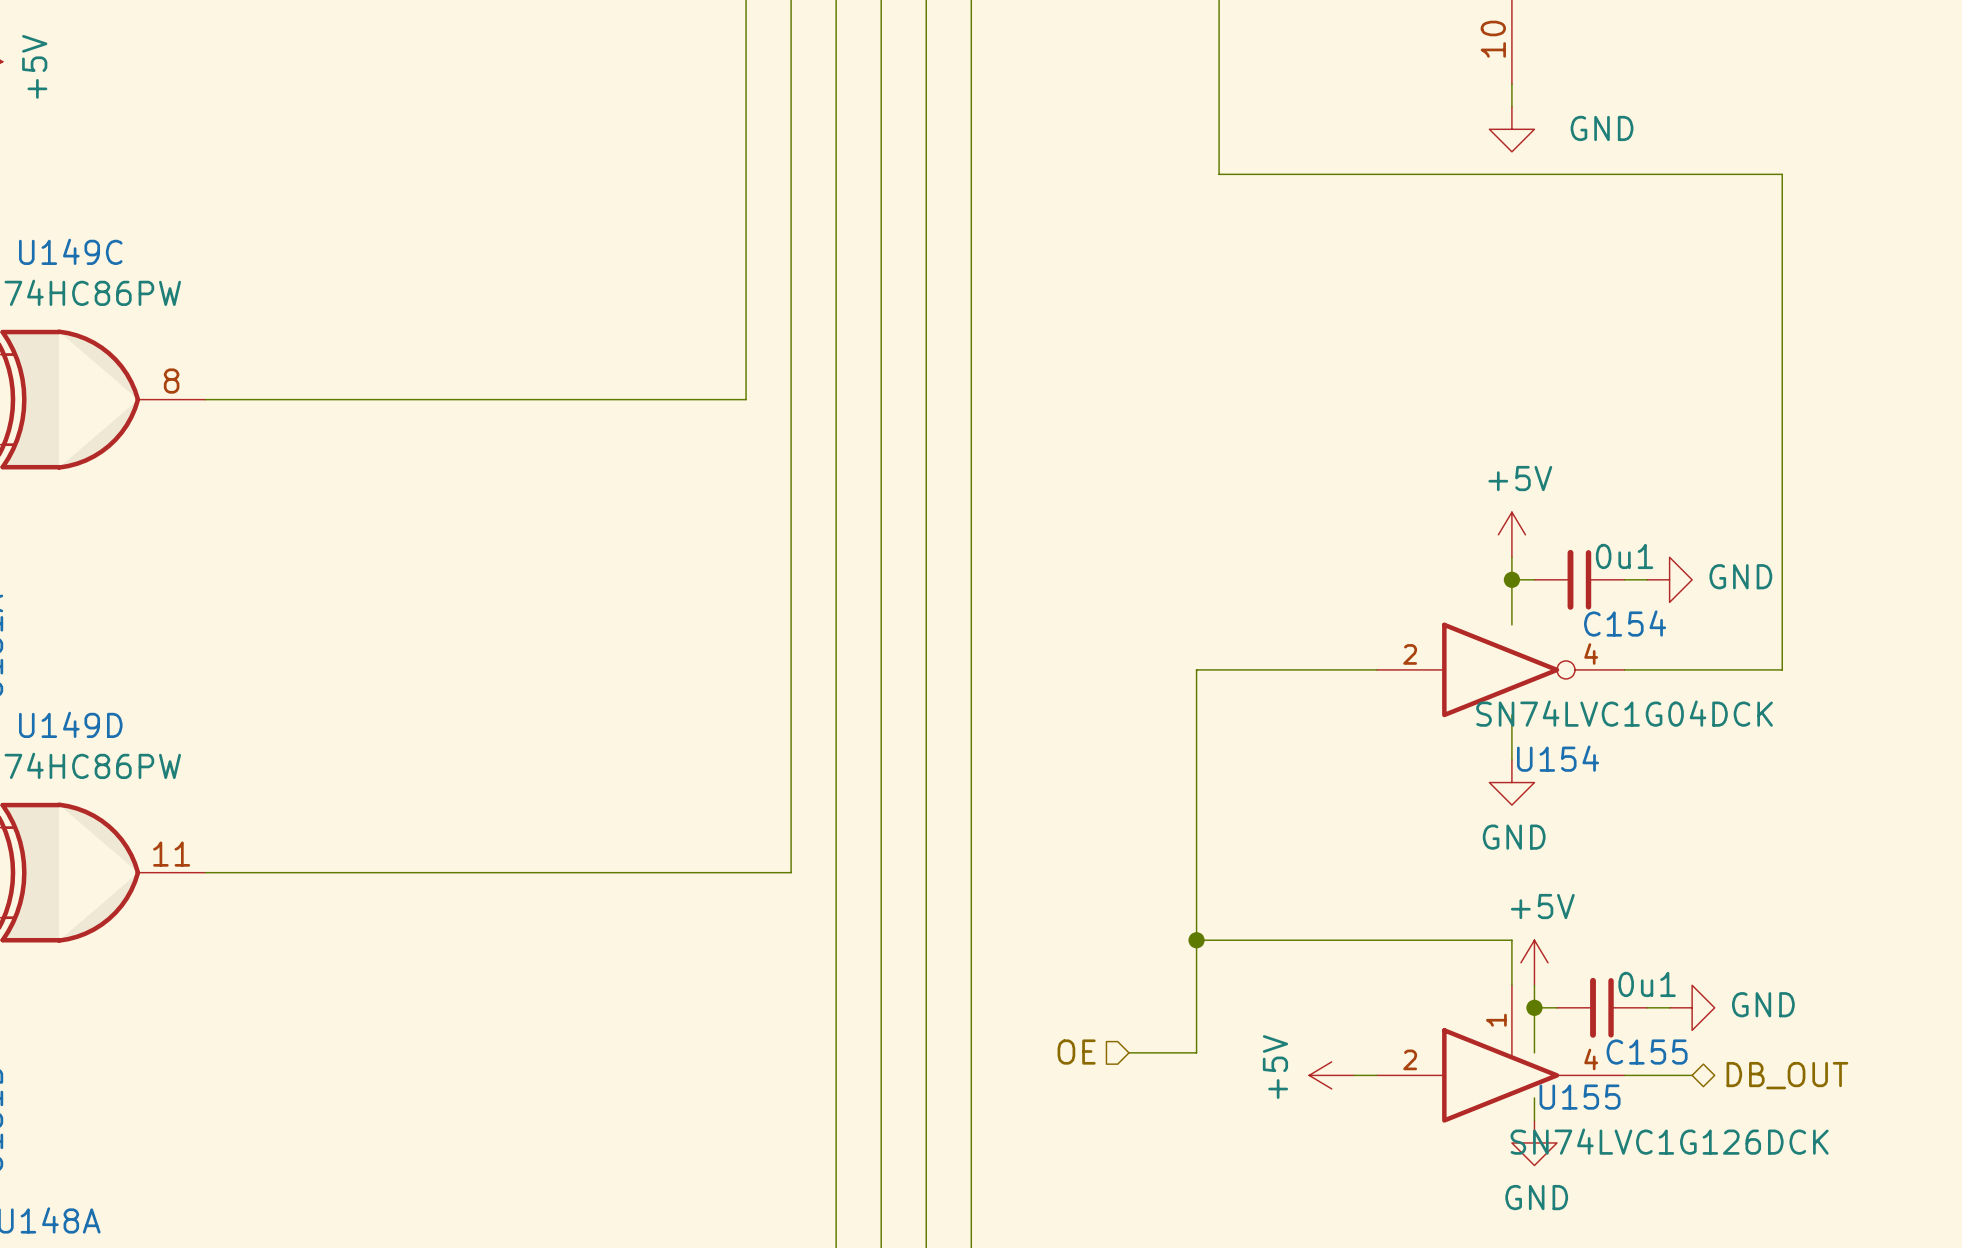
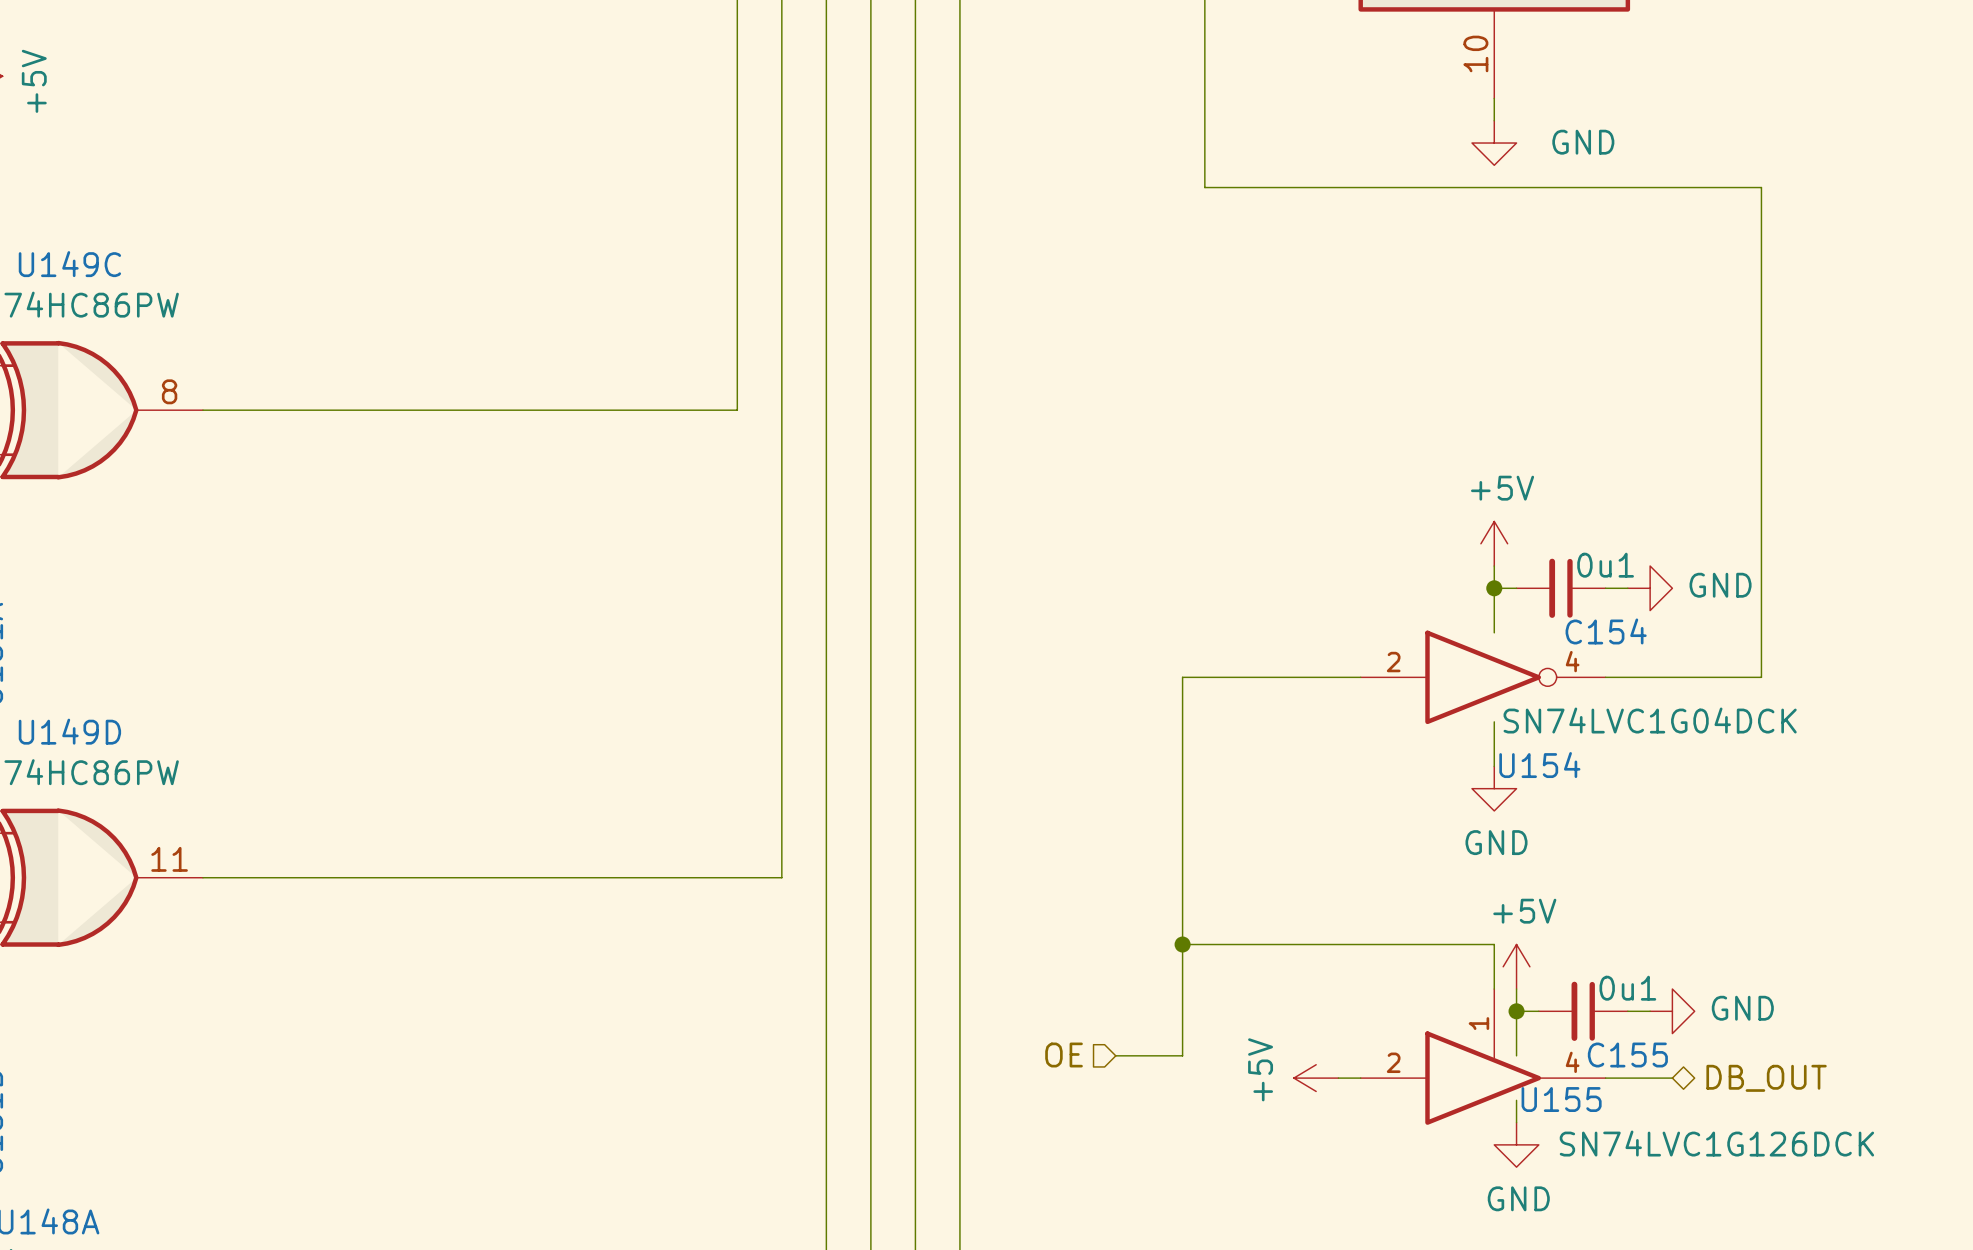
U154 value position: SN74LVC1G04DCK (1624, 713) -> SN74LVC1G04DCK (1650, 720)
U155 value position: SN74LVC1G126DCK (1669, 1141) -> SN74LVC1G126DCK (1716, 1143)

